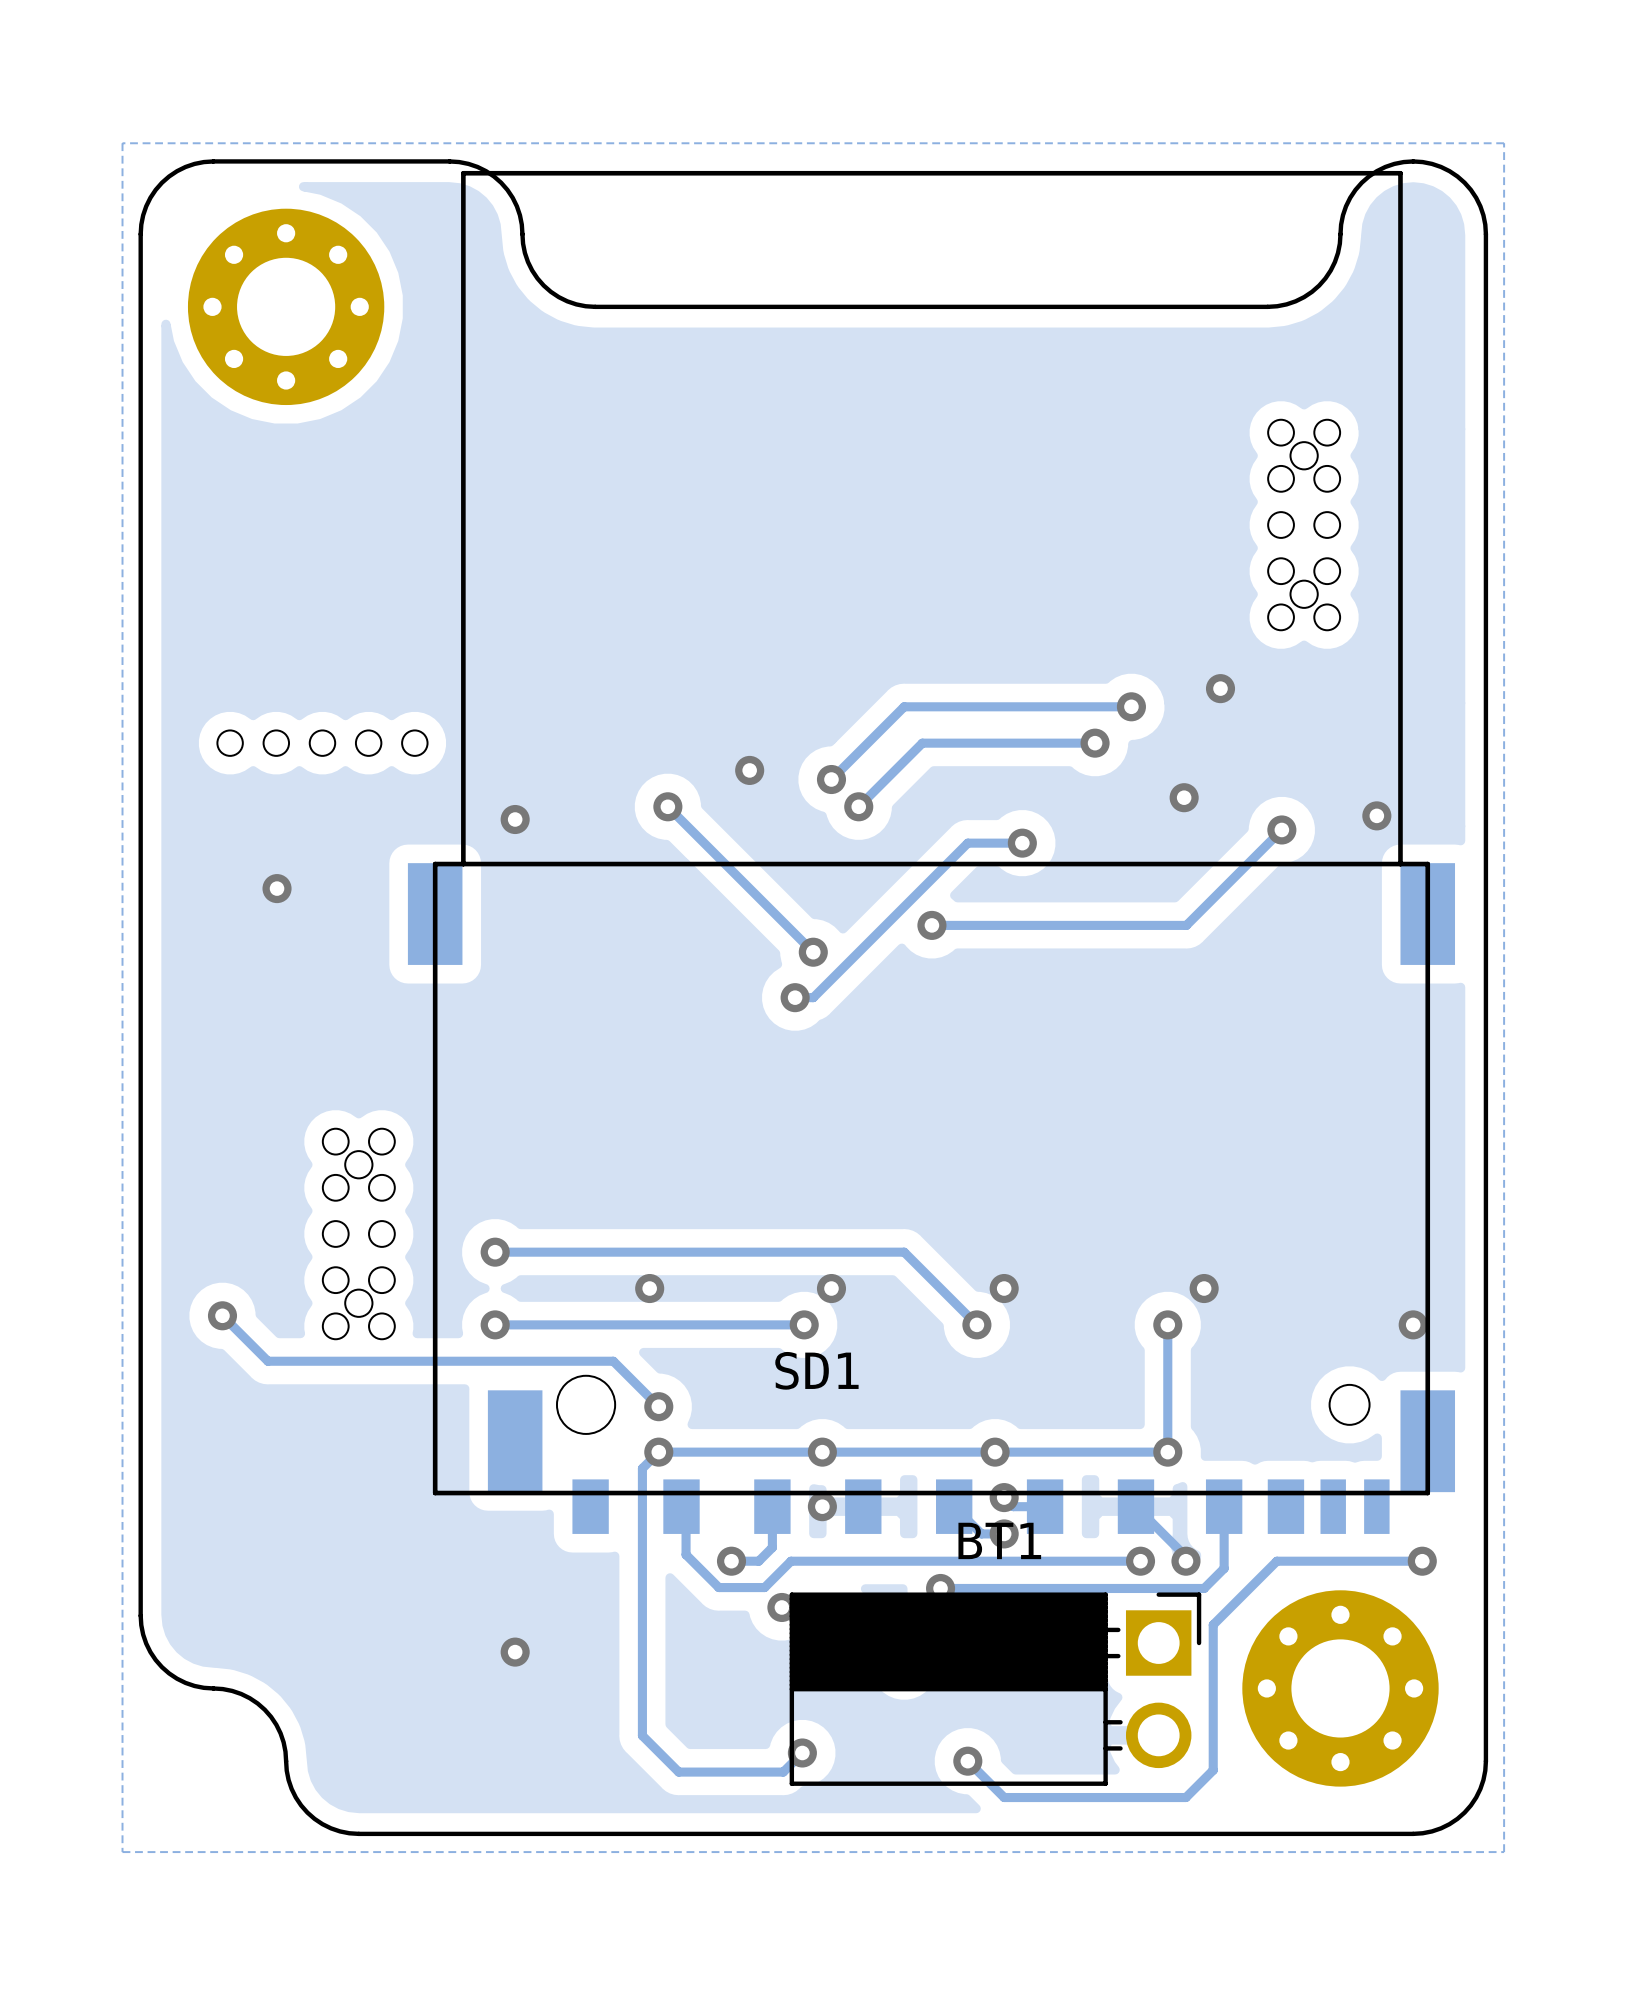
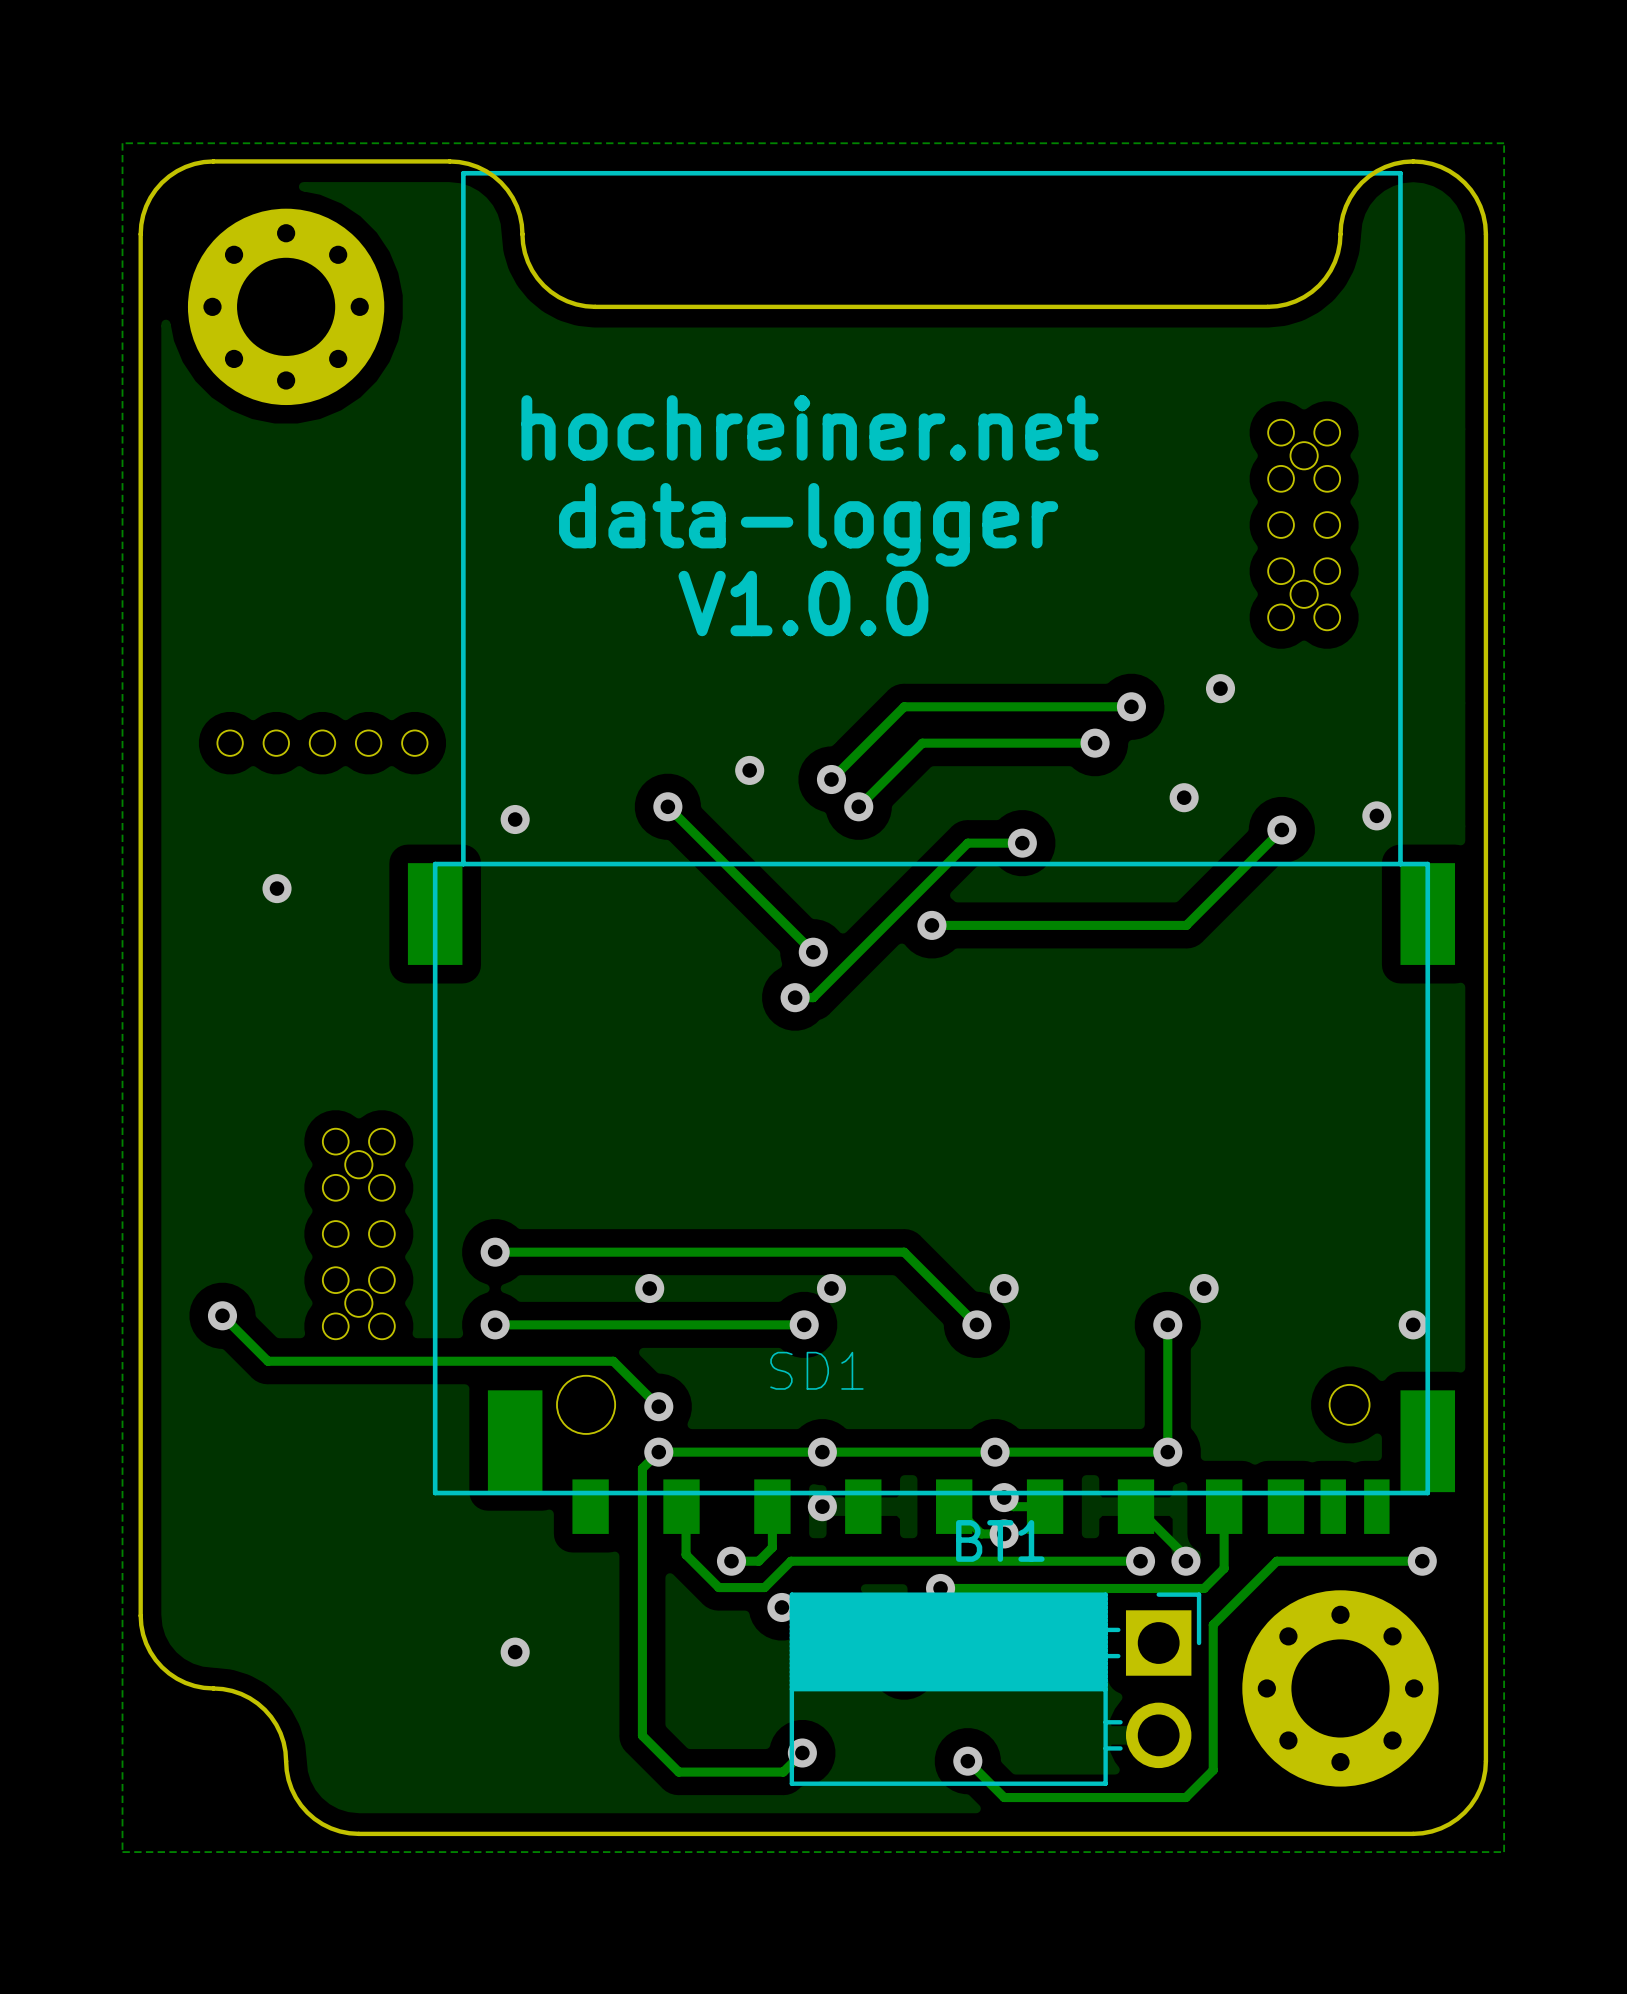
text: none -> hochreiner.net (809, 427)
text: none -> data-logger (808, 524)
text: none -> V1.0.0 (803, 603)

